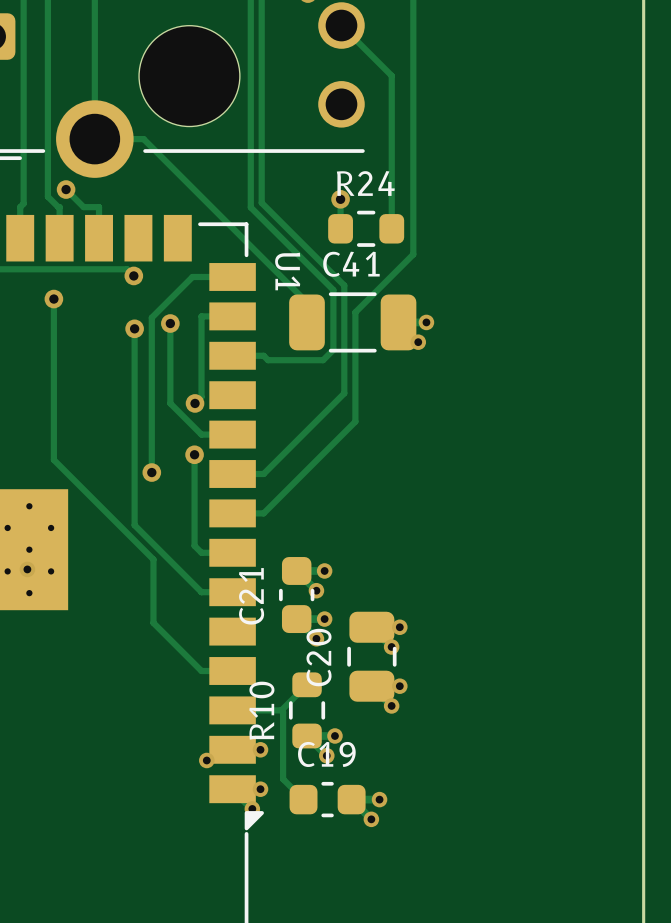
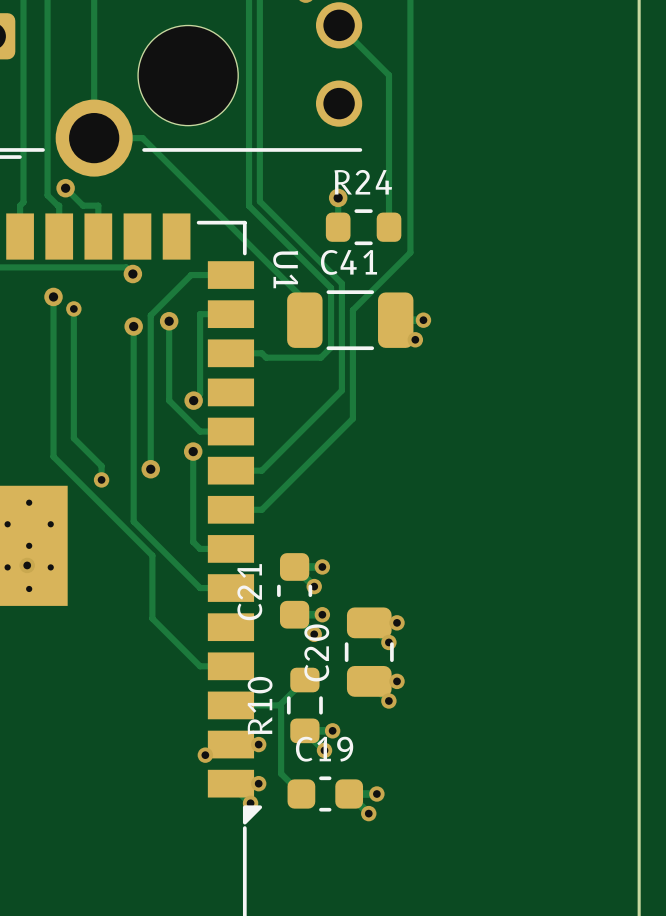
track: none -> (73, 308) (73, 438) (101, 466) (101, 479)
via: none -> (73, 308)
via: none -> (101, 479)

